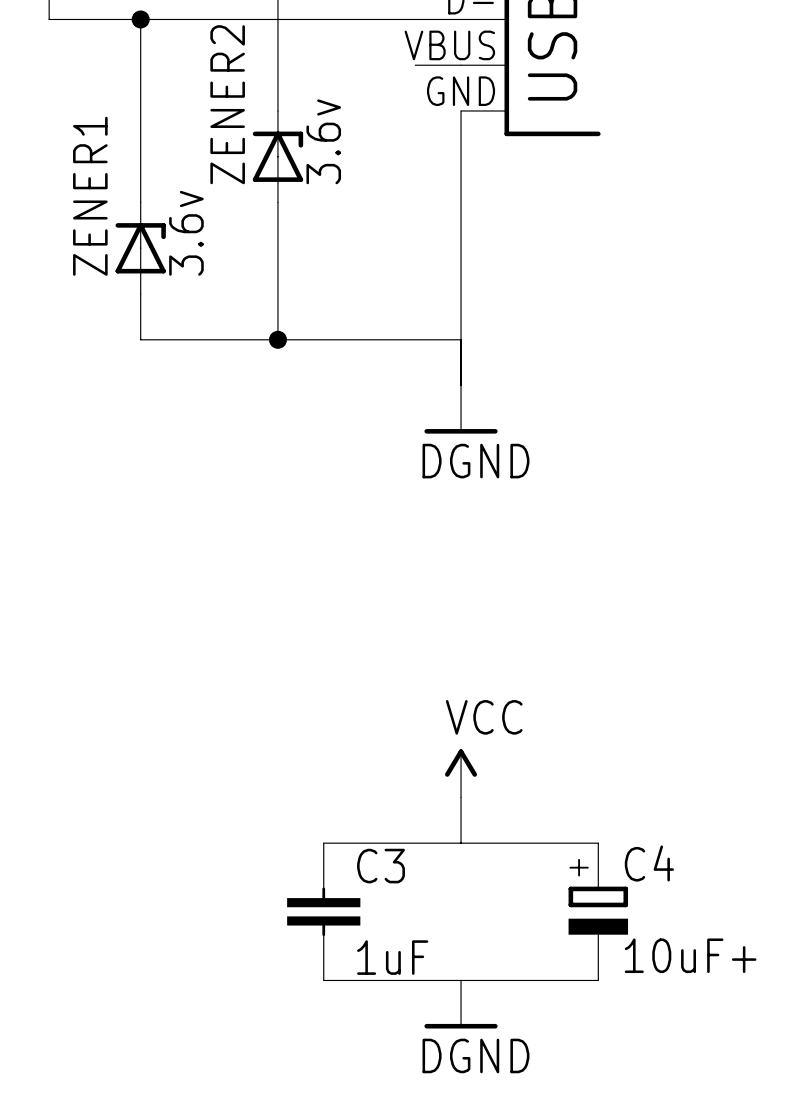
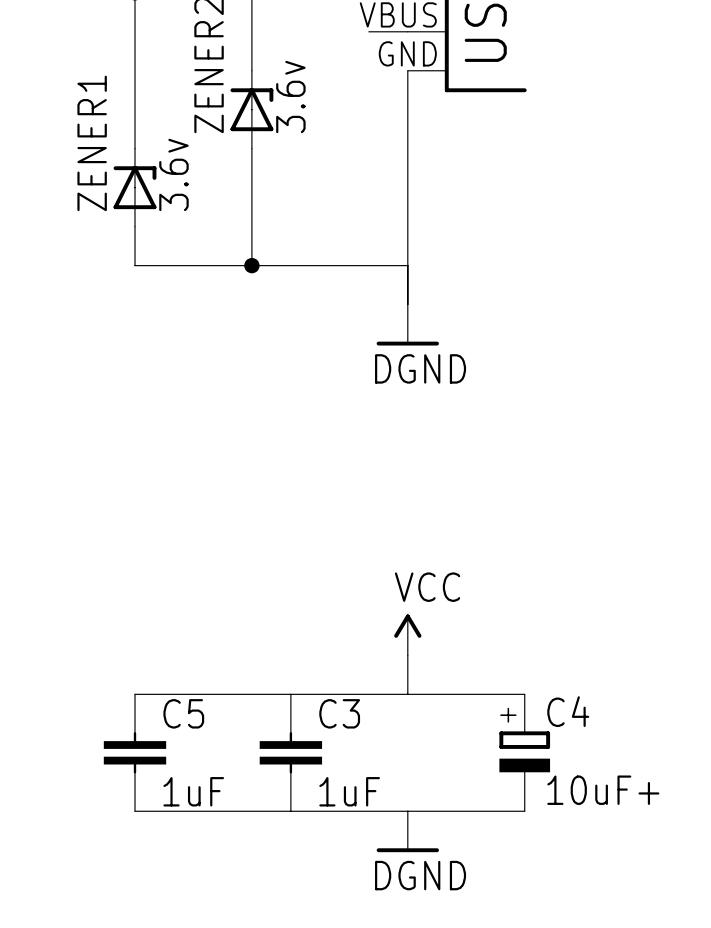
wire: none -> (135, 694) (290, 694)
C5: none -> 1uF (135, 752)
wire: none -> (135, 811) (290, 811)

